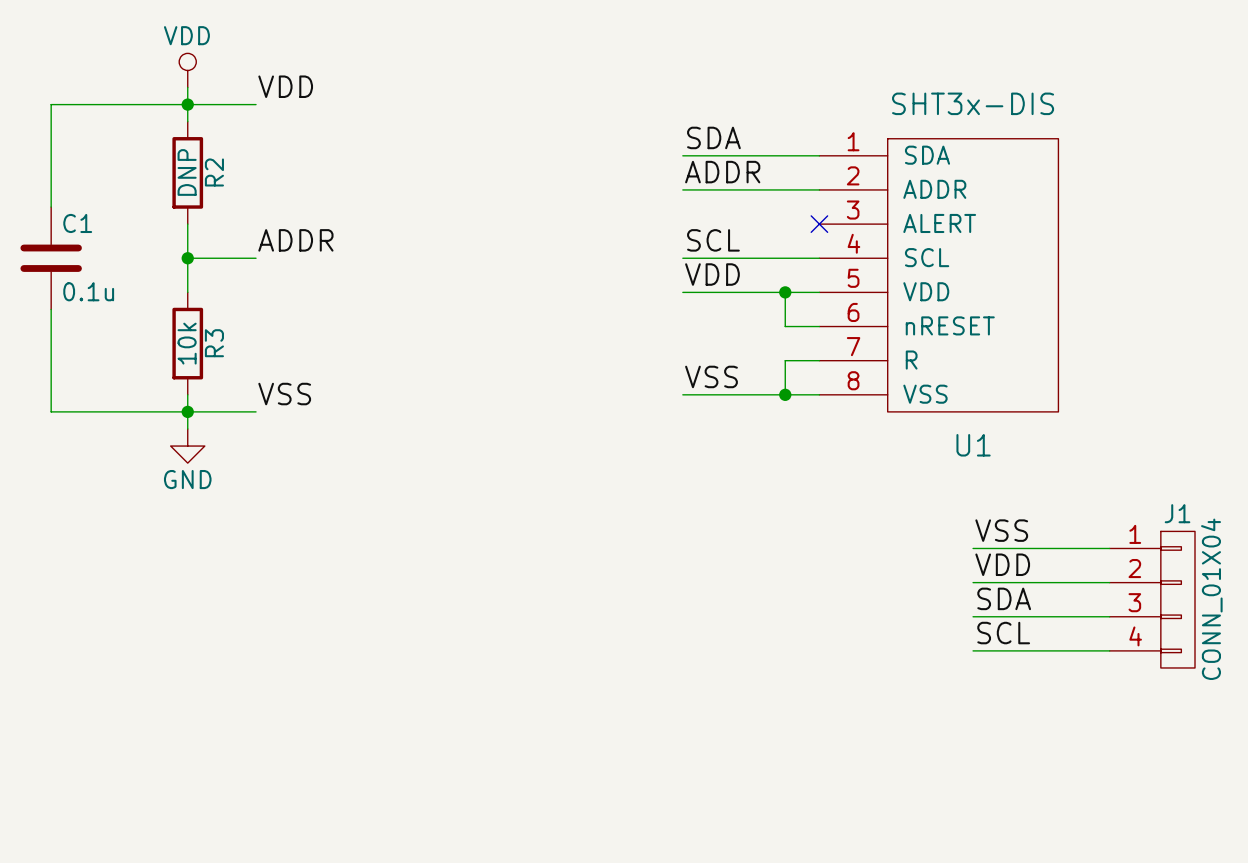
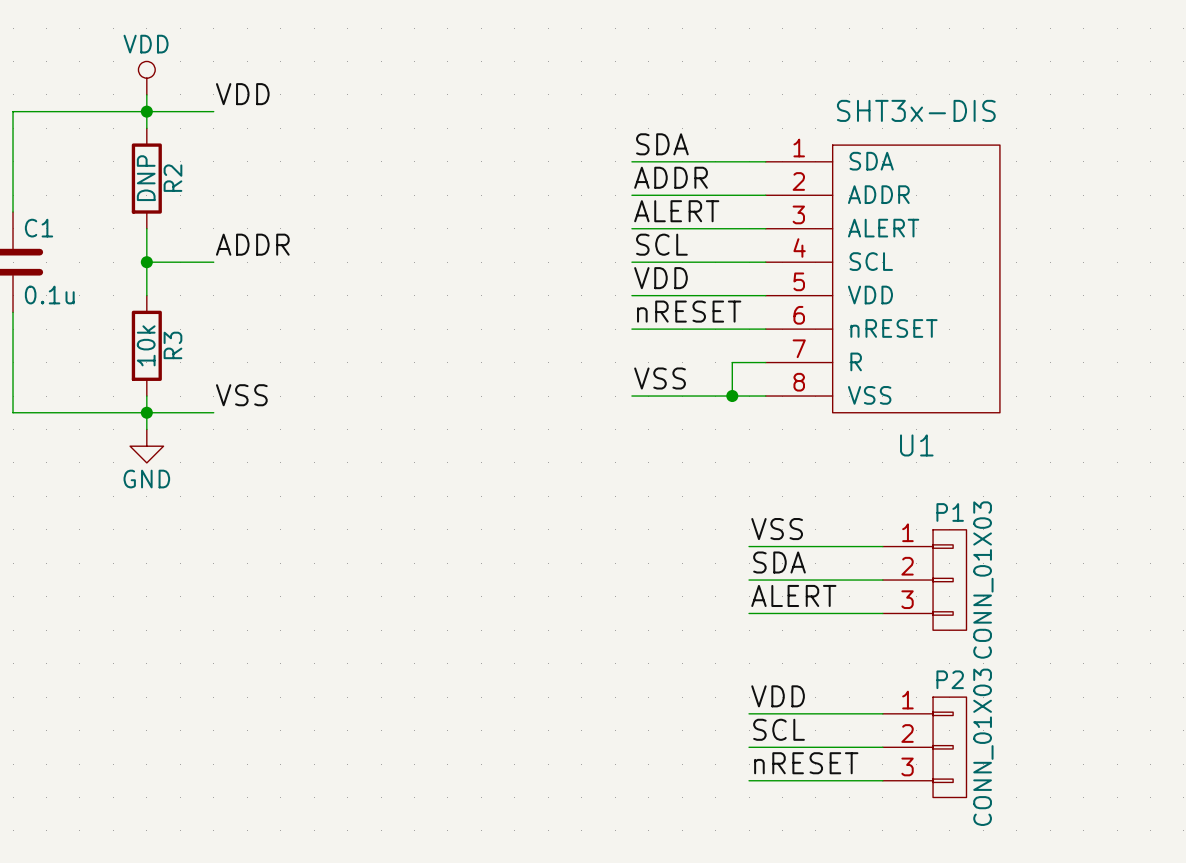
label: none -> ALERT (676, 211)
wire: none -> (631, 228) (765, 228)
no-connect mark: (819, 224) -> none
wire: (785, 292) (785, 326) -> (631, 329) (732, 329)
junction: (785, 292) -> none
label: none -> nRESET (689, 311)
label position: VSS (1001, 530) -> VSS (777, 529)
wire: (973, 548) (1109, 548) -> (749, 546) (882, 546)
label position: VDD (1002, 564) -> VDD (778, 696)
wire: (973, 582) (1109, 582) -> (749, 580) (882, 580)
P1: none -> CONN_01X03 (924, 580)
label: none -> ALERT (793, 595)
label position: SDA (1004, 598) -> SDA (779, 562)
J1: CONN_01X04 (1152, 599) -> none
wire: (973, 616) (1109, 616) -> (749, 613) (882, 613)
label position: SCL (1003, 633) -> SCL (779, 729)
wire: (973, 650) (1109, 650) -> (749, 780) (882, 780)
wire: none -> (749, 713) (882, 713)
wire: none -> (749, 747) (882, 747)
P2: none -> CONN_01X03 (924, 747)
label: none -> nRESET (806, 763)

